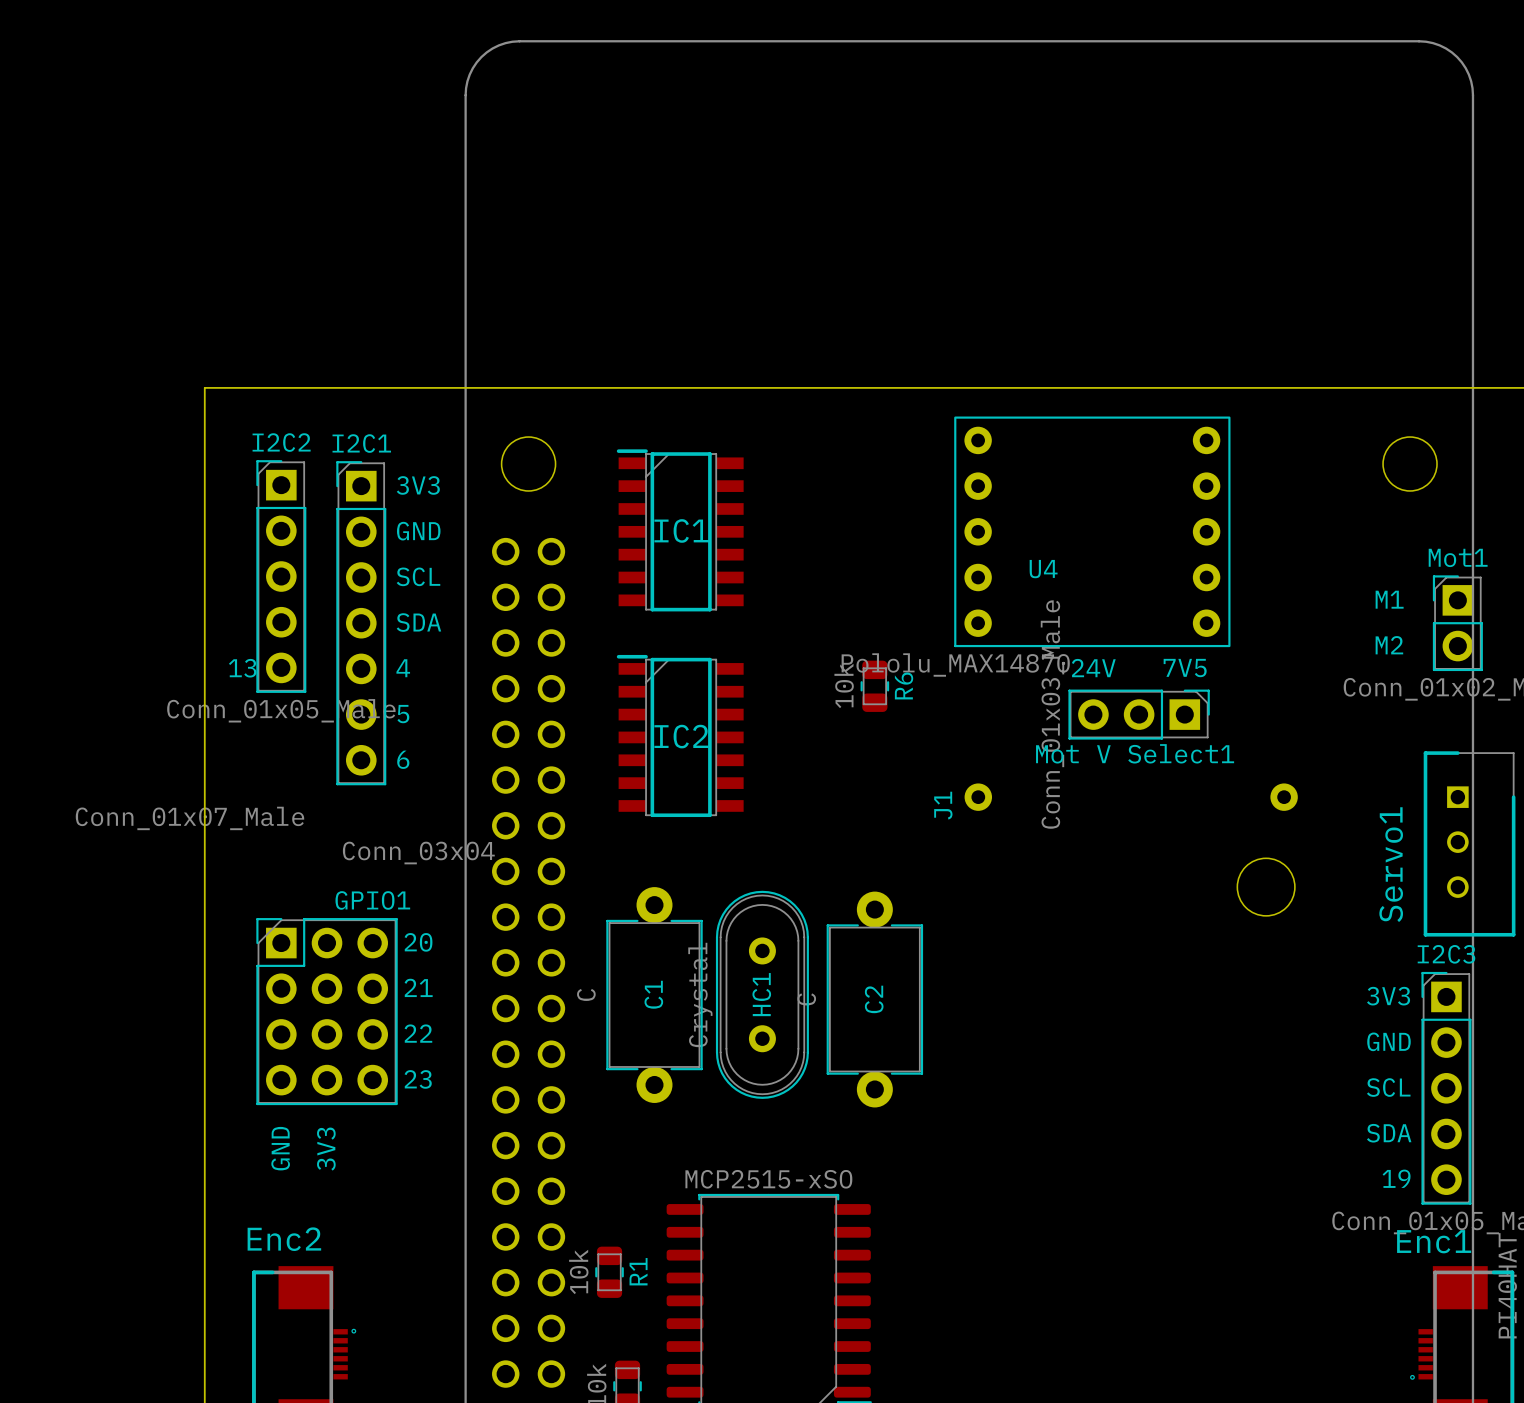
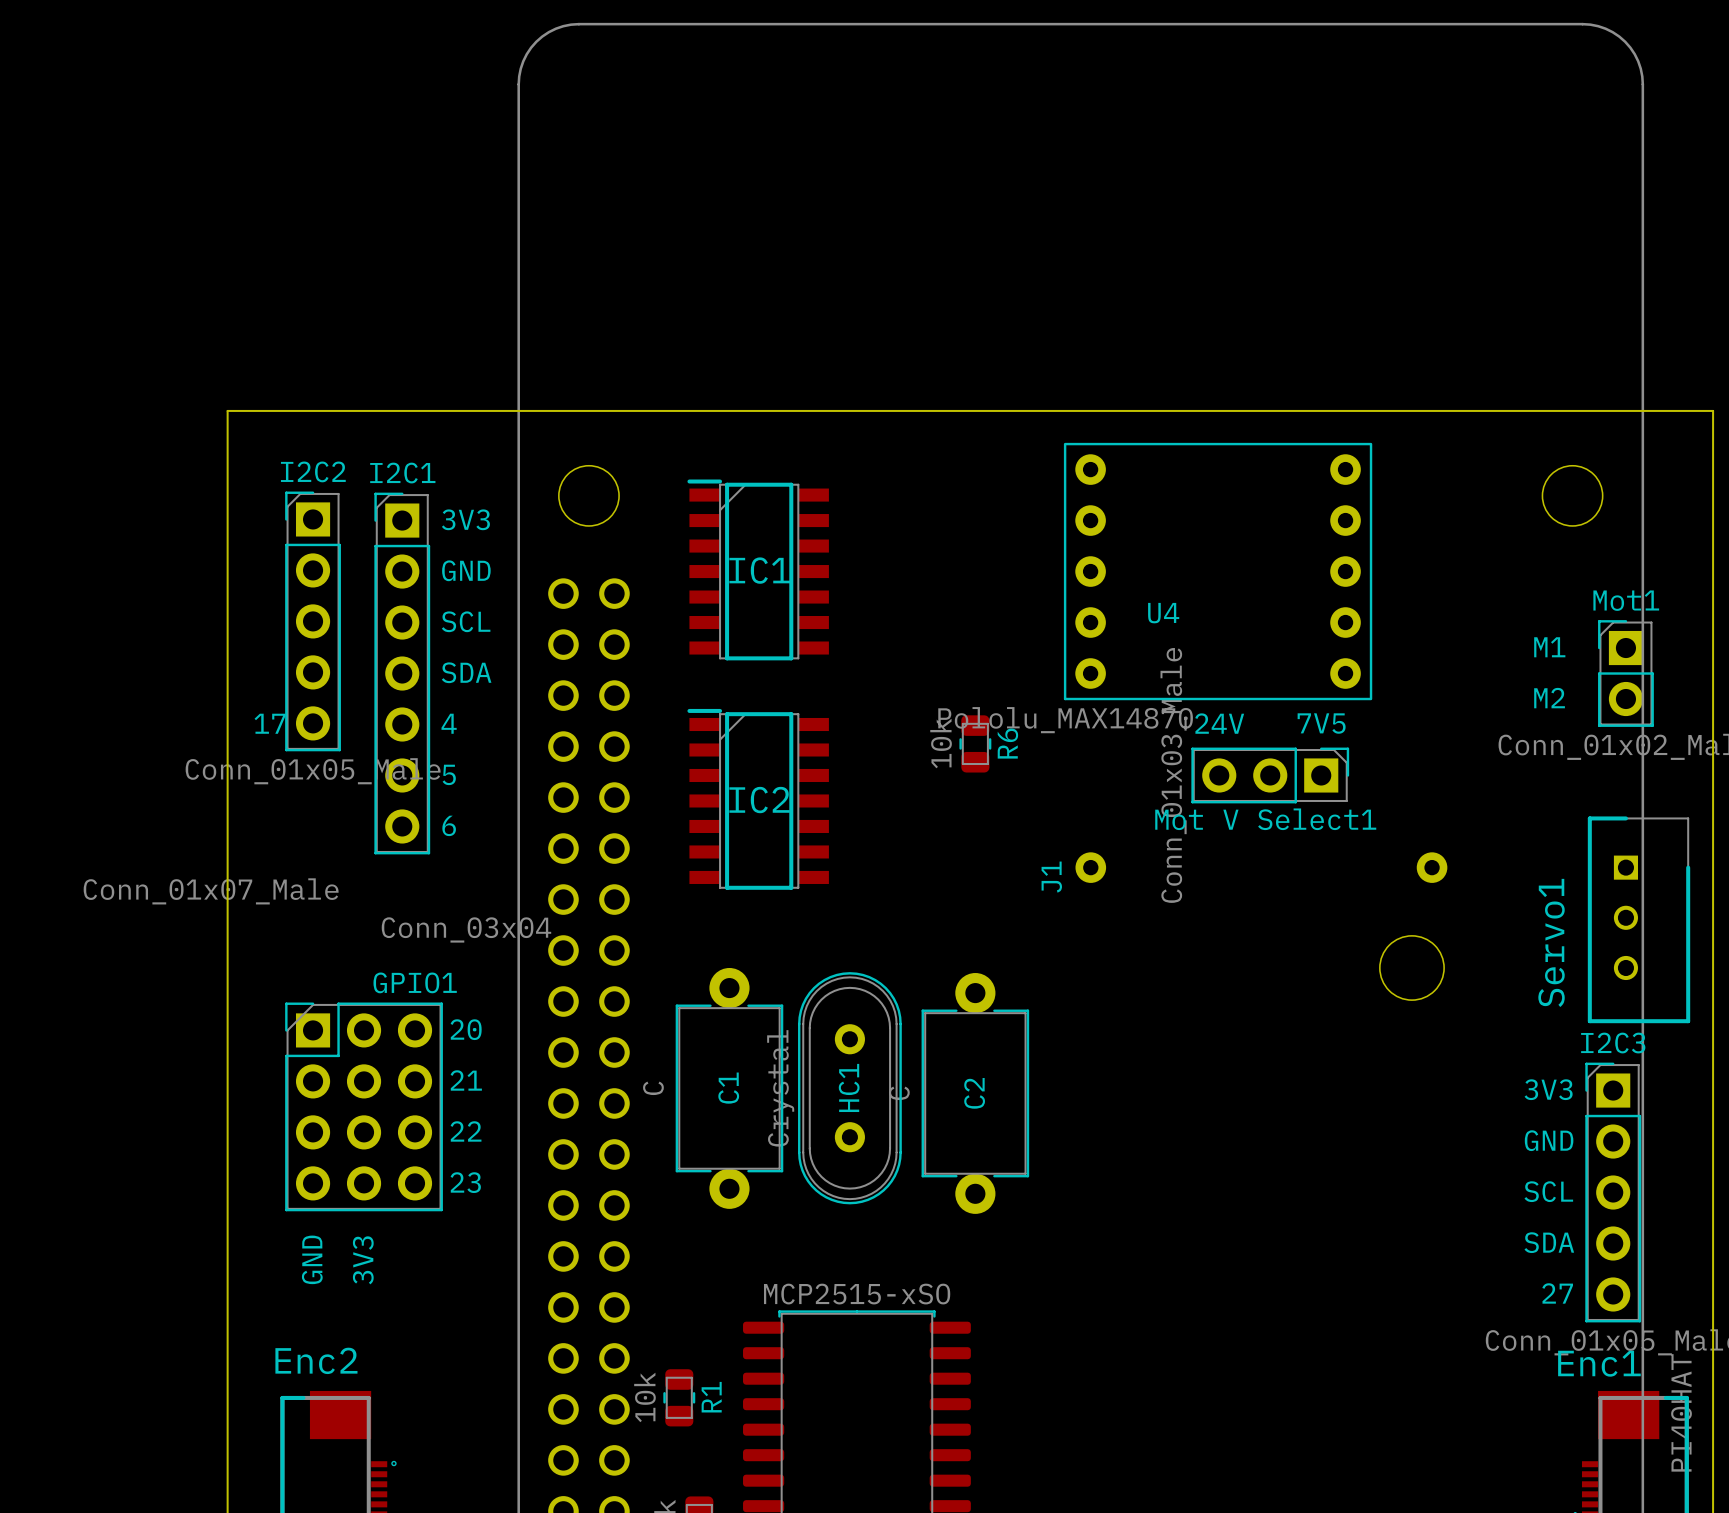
text: 13 (242, 668) -> 17 (270, 723)
text: 19 (1396, 1178) -> 27 (1557, 1293)

